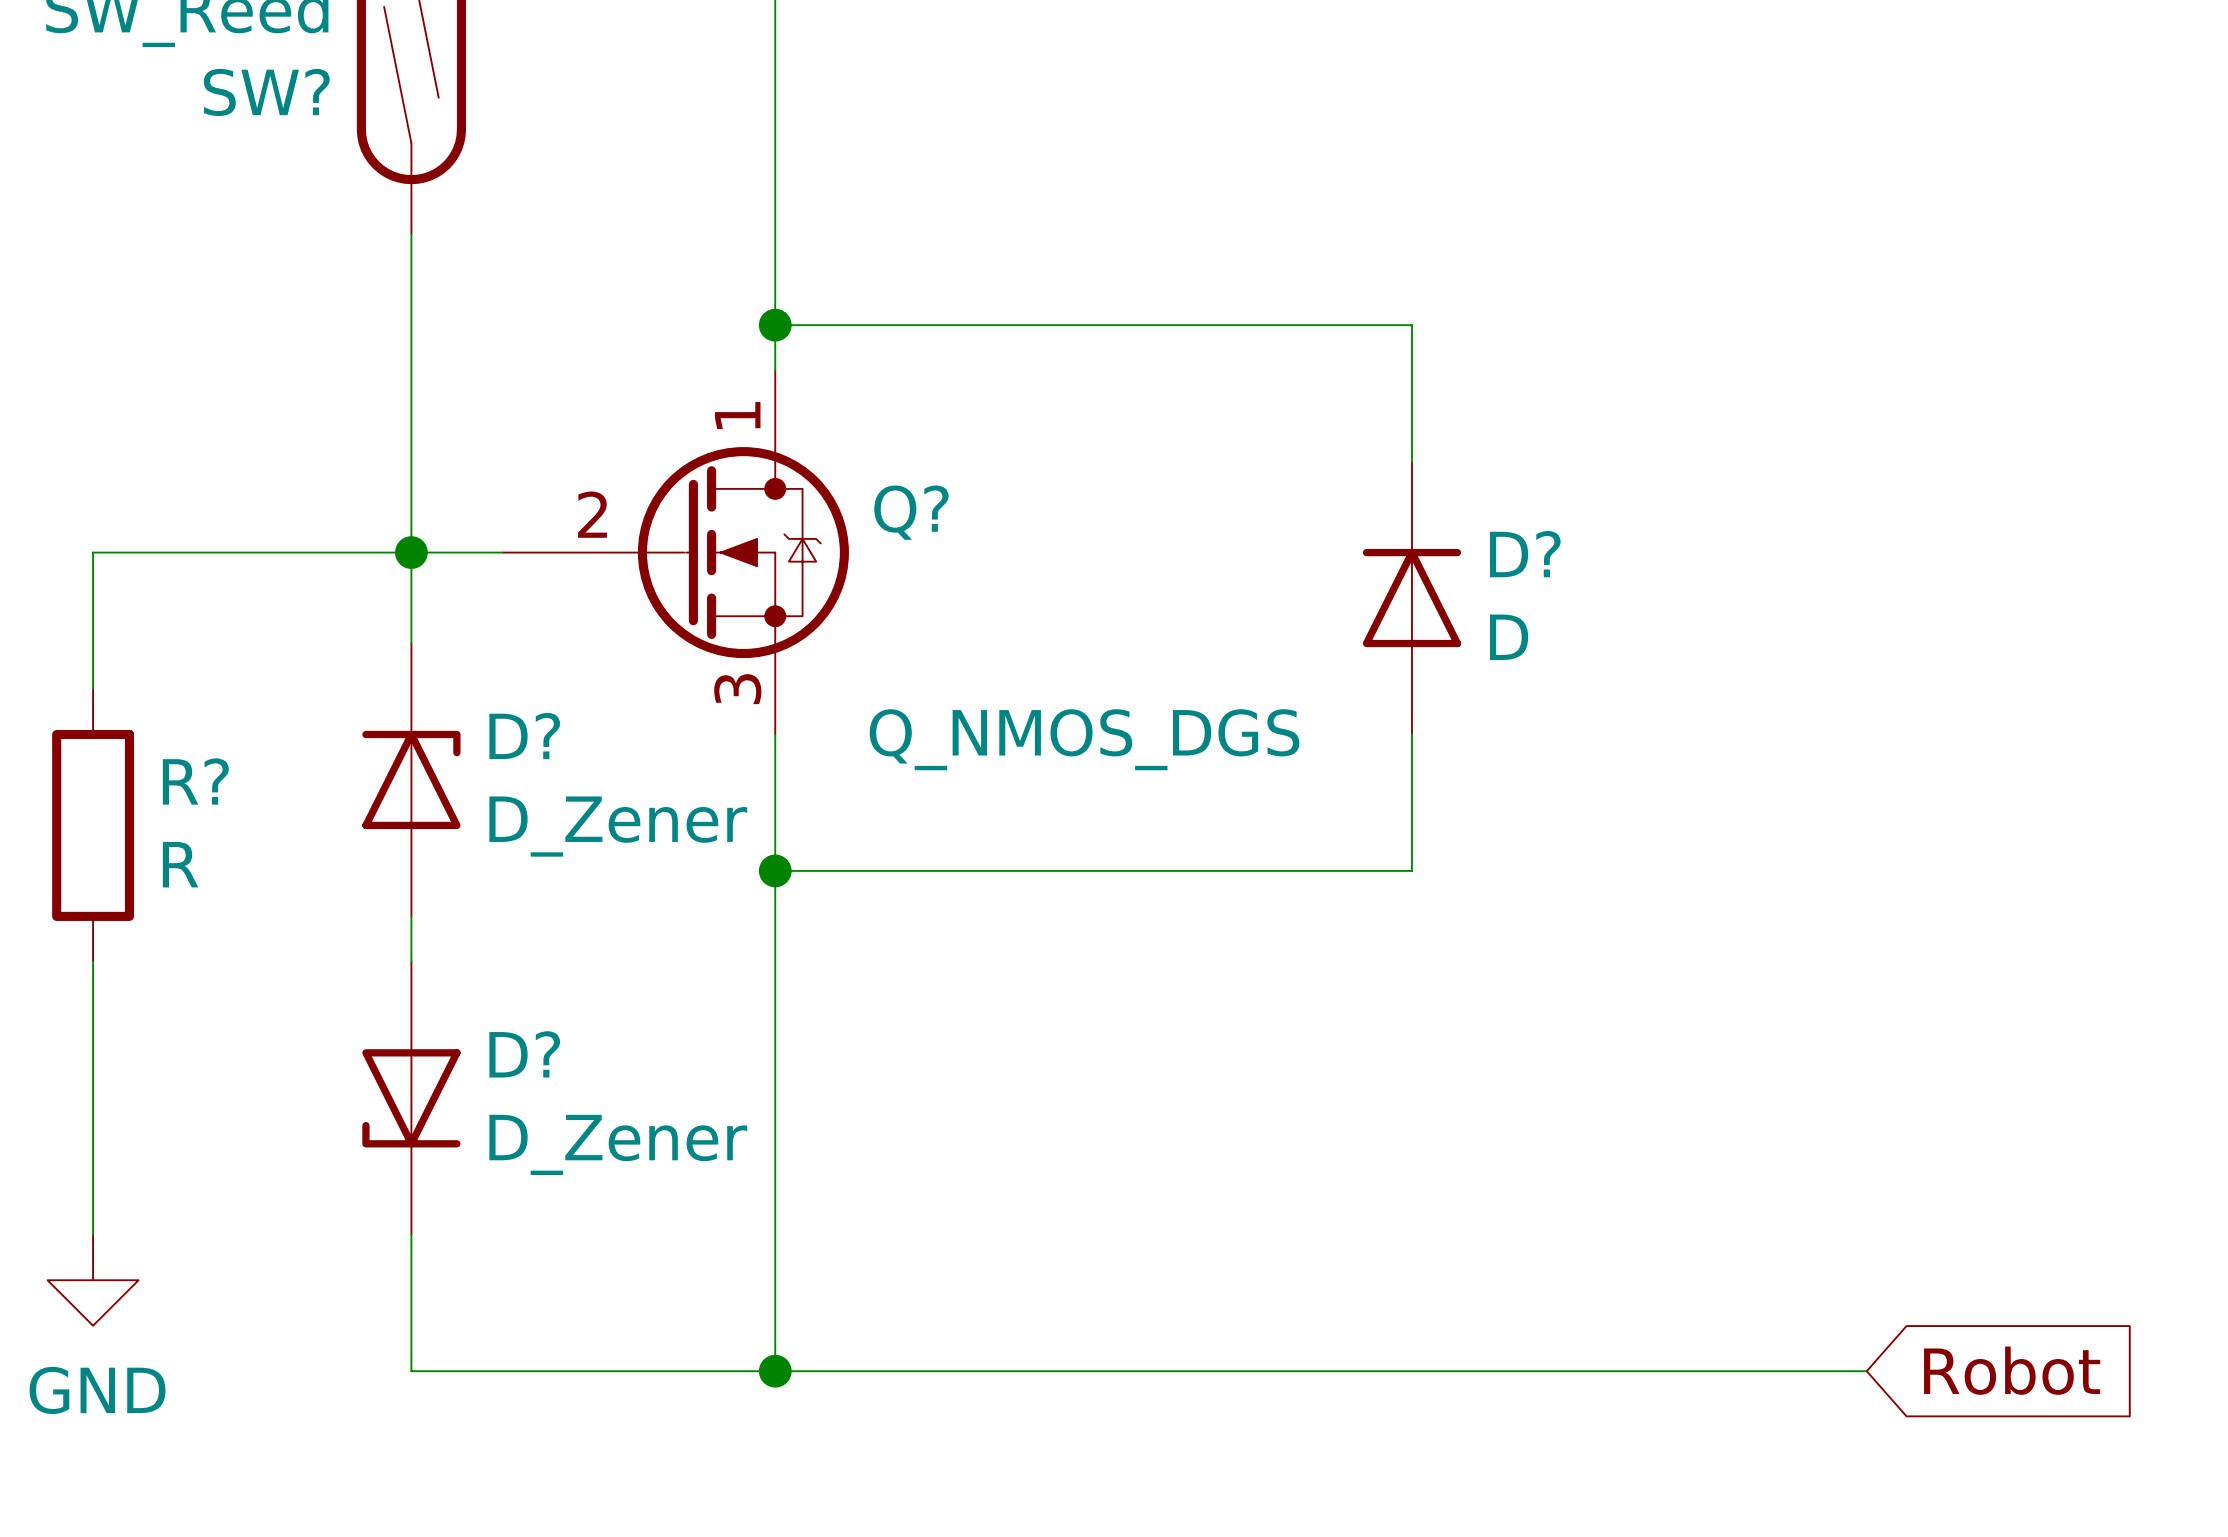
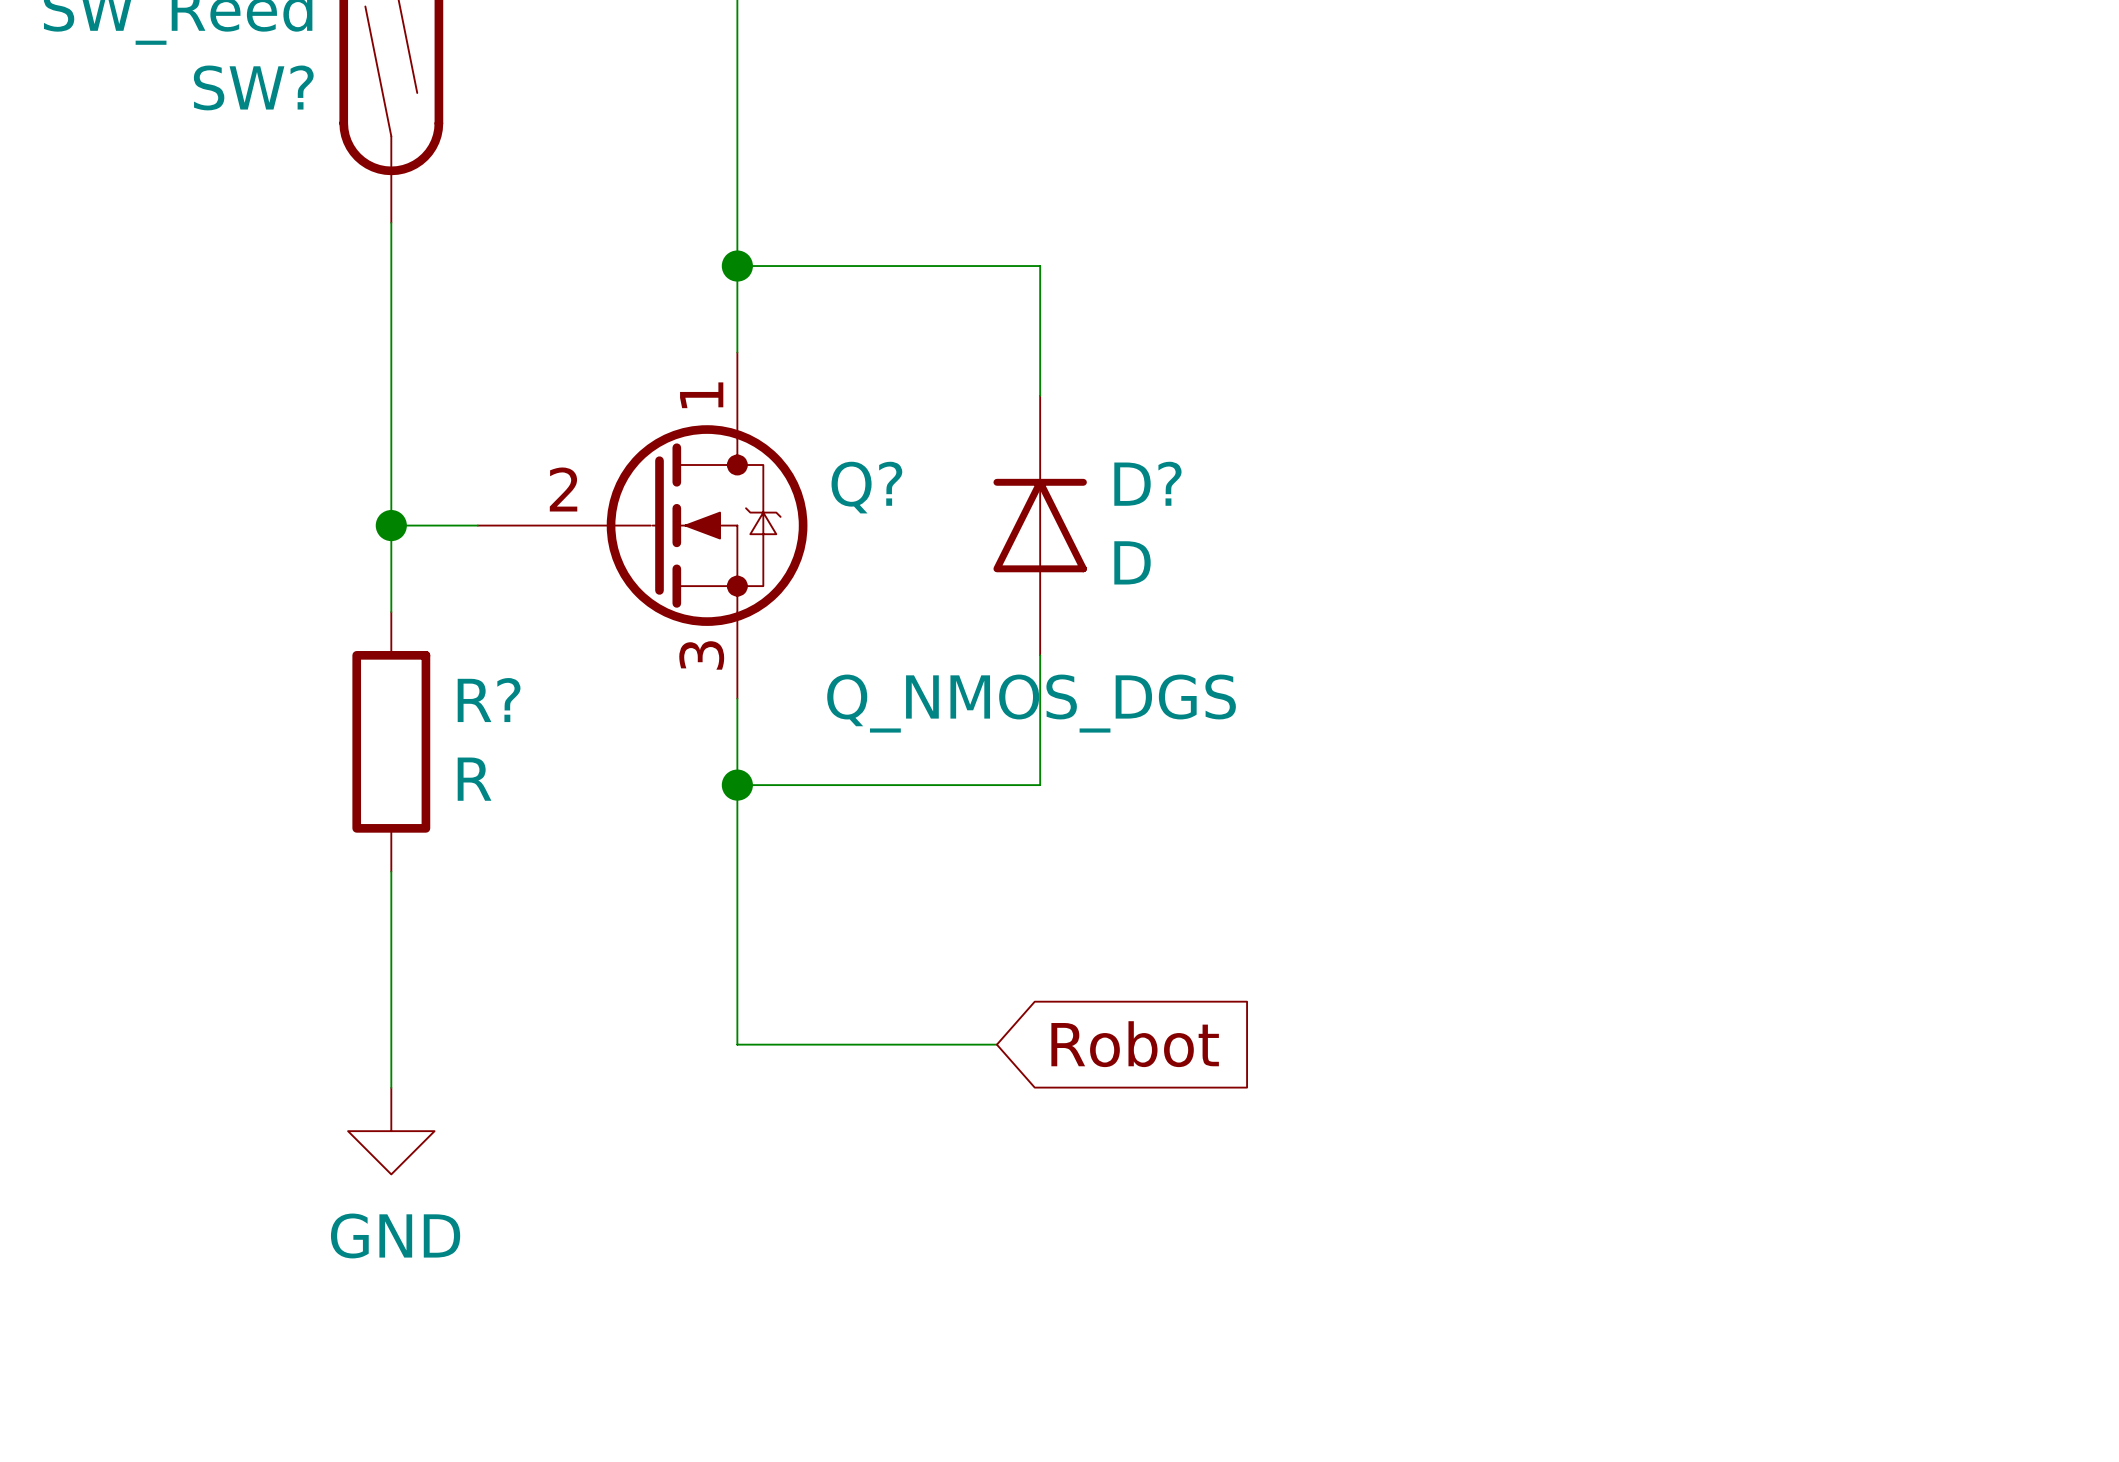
wire: none -> (737, 266) (1040, 266) (1040, 395)
wire: (775, 325) (1411, 325) (1411, 461) -> none
junction position: (775, 325) -> (737, 266)
wire: (411, 552) (93, 552) (93, 689) -> none
D? position: (1411, 598) -> (1040, 525)
wire: none -> (1040, 655) (1040, 785) (737, 785)
wire: (1411, 734) (1411, 870) (775, 870) -> none
D?: D_Zener (411, 779) -> none
R? position: (93, 825) -> (391, 741)
junction position: (775, 870) -> (737, 785)
wire: (93, 961) (93, 1234) -> none
D?: D_Zener (411, 1098) -> none
wire: (775, 1098) (775, 1371) -> (737, 1044) (996, 1044)
wire: (411, 1234) (411, 1371) (1866, 1371) -> none
power symbol position: GND (93, 1280) -> GND (391, 1131)
global label position: Robot (2012, 1370) -> Robot (1135, 1044)
junction: (775, 1371) -> none

